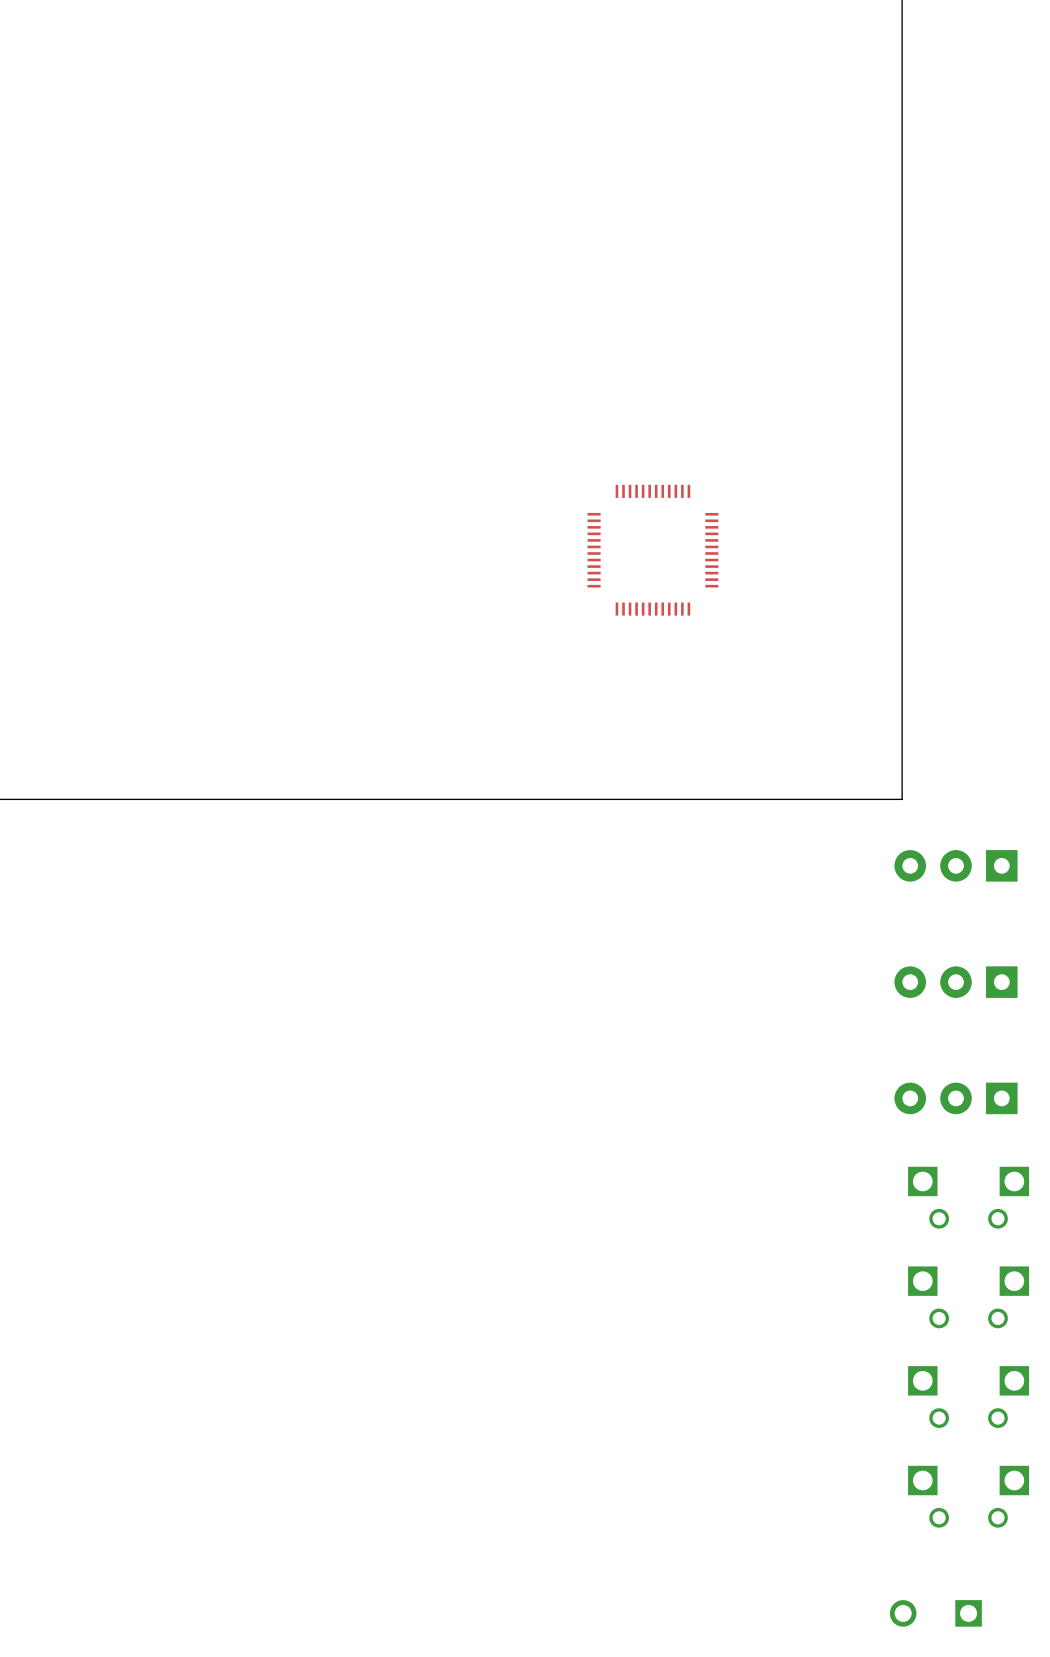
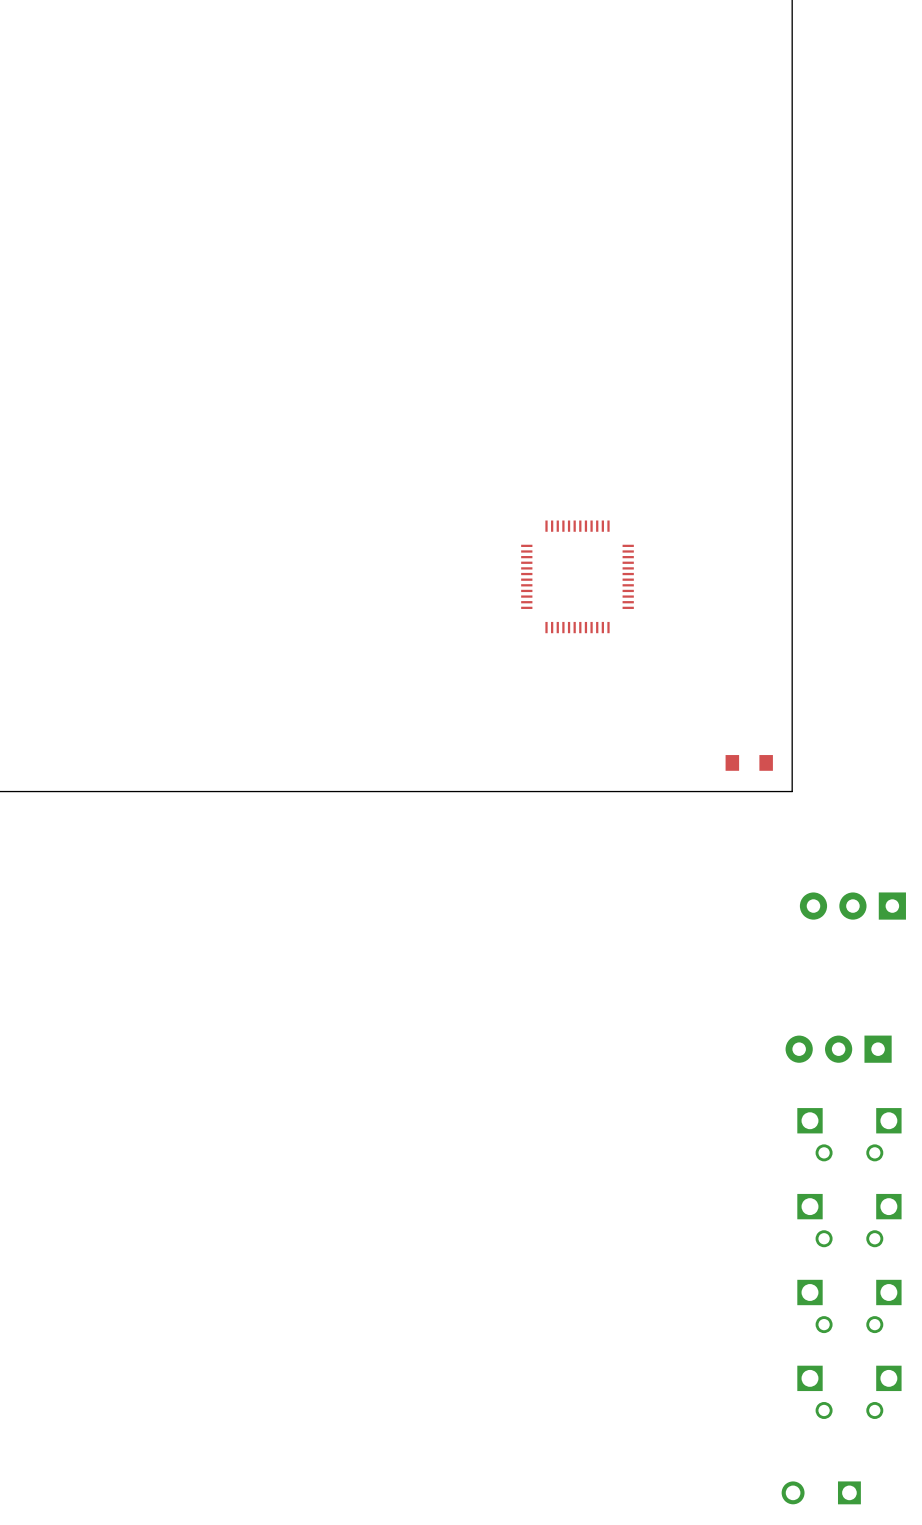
part: none -> (749, 762)
part: (956, 865) -> none
part: none -> (852, 906)
part: (956, 982) -> none

